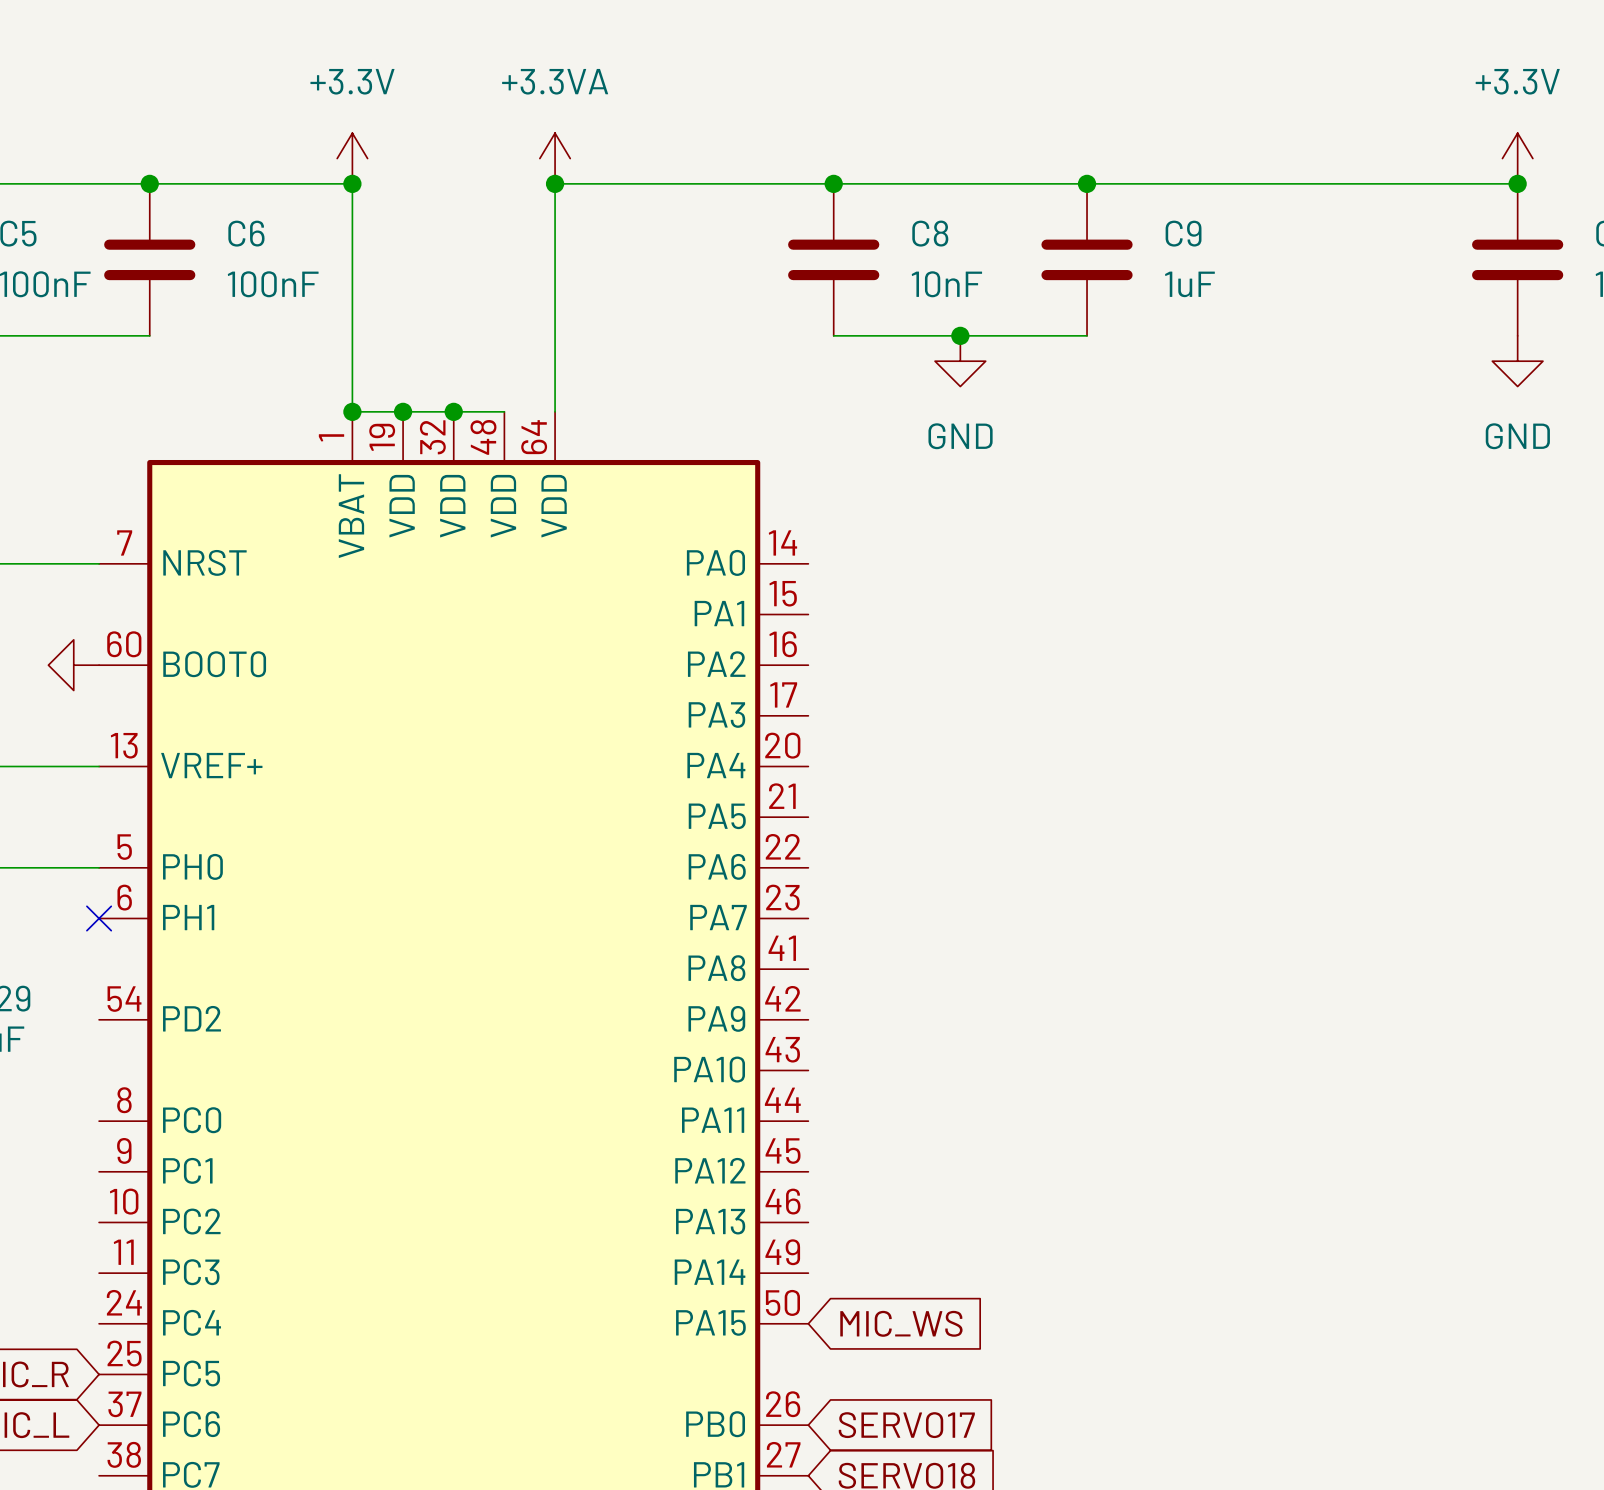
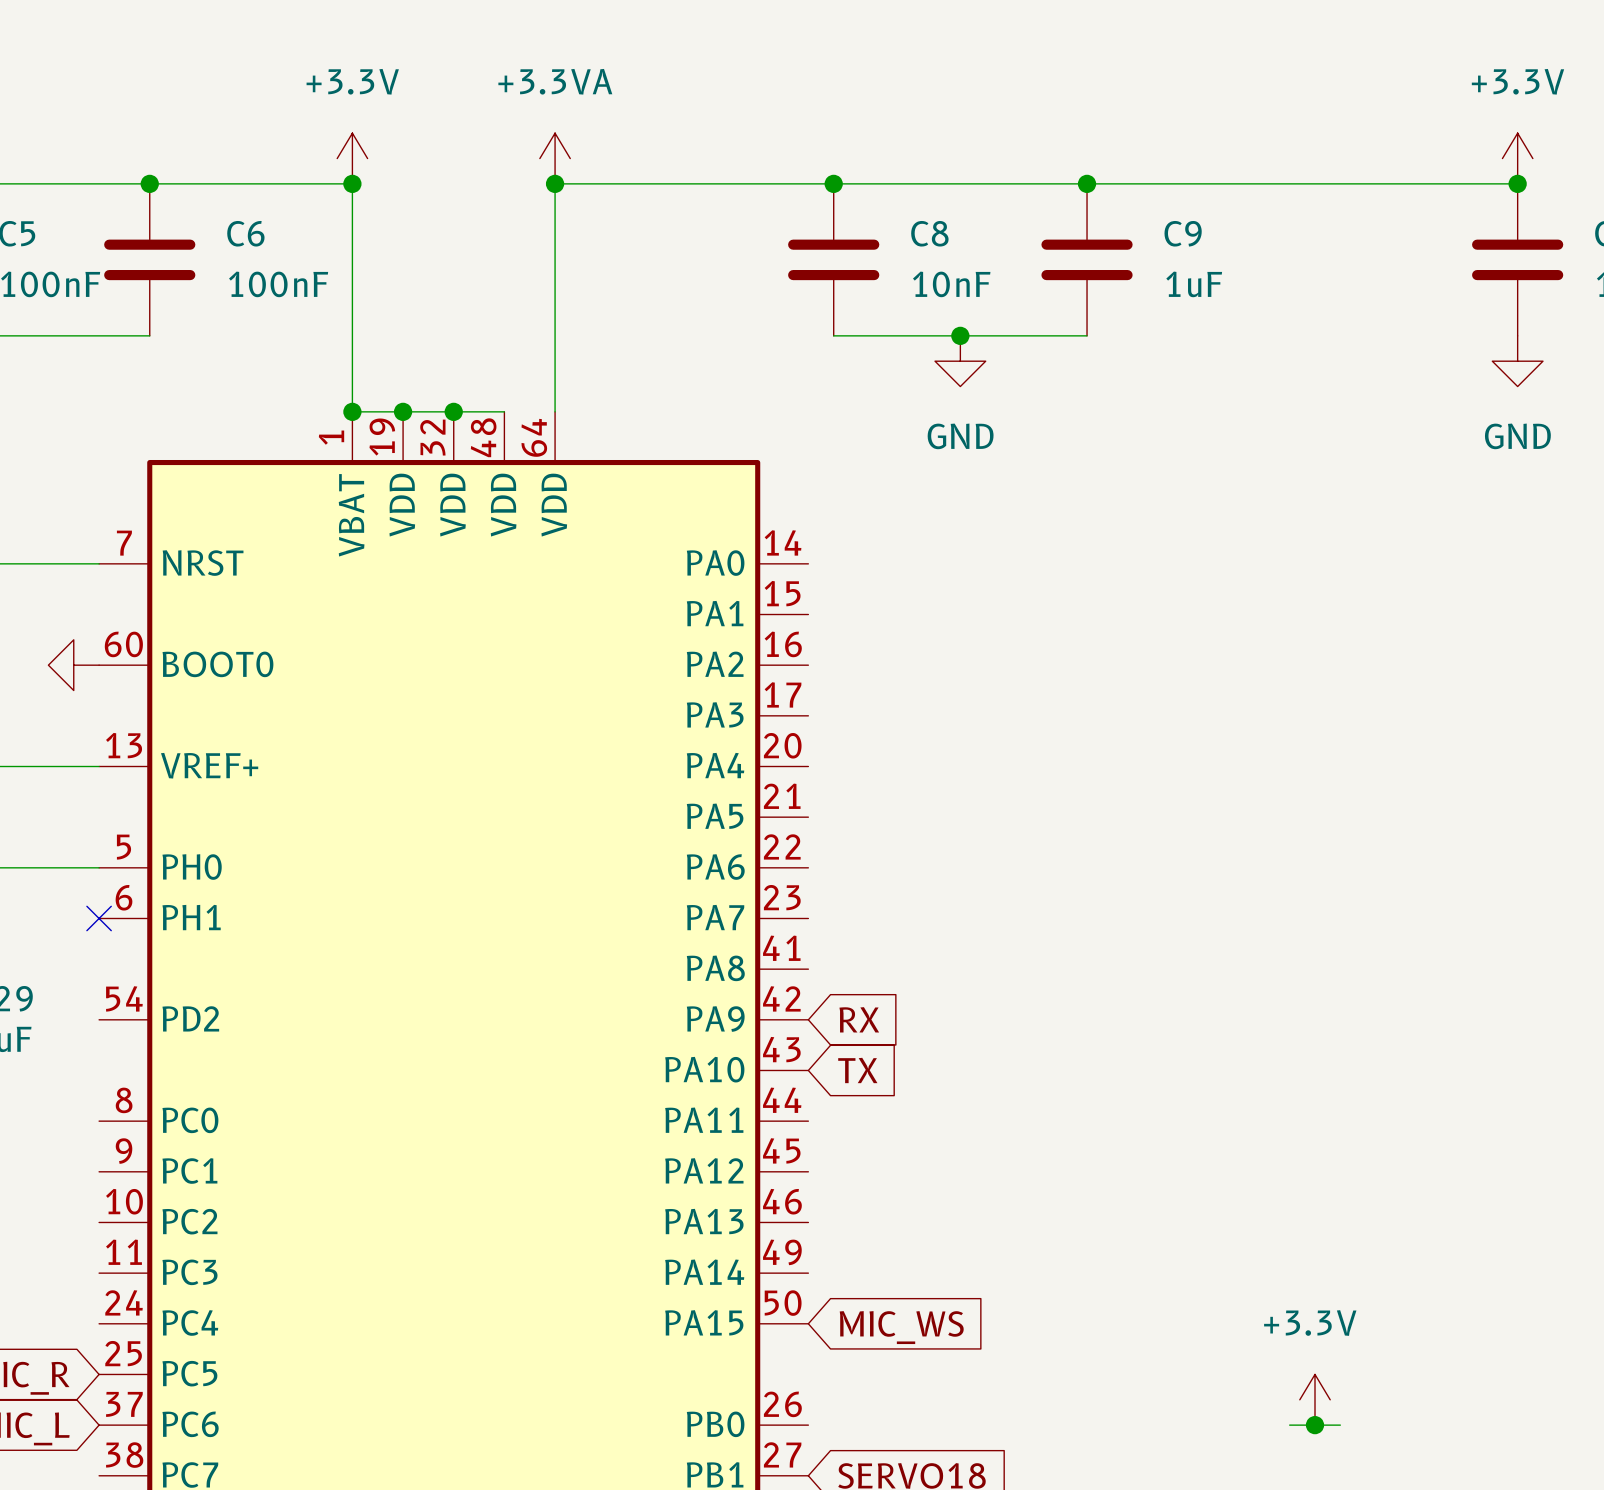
global label: none -> RX (859, 1019)
global label: none -> TX (857, 1070)
power symbol: none -> +3.3V (1315, 1399)
global label: SERVO17 (906, 1425) -> none
wire: none -> (1289, 1425) (1340, 1425)
junction: none -> (1315, 1425)

